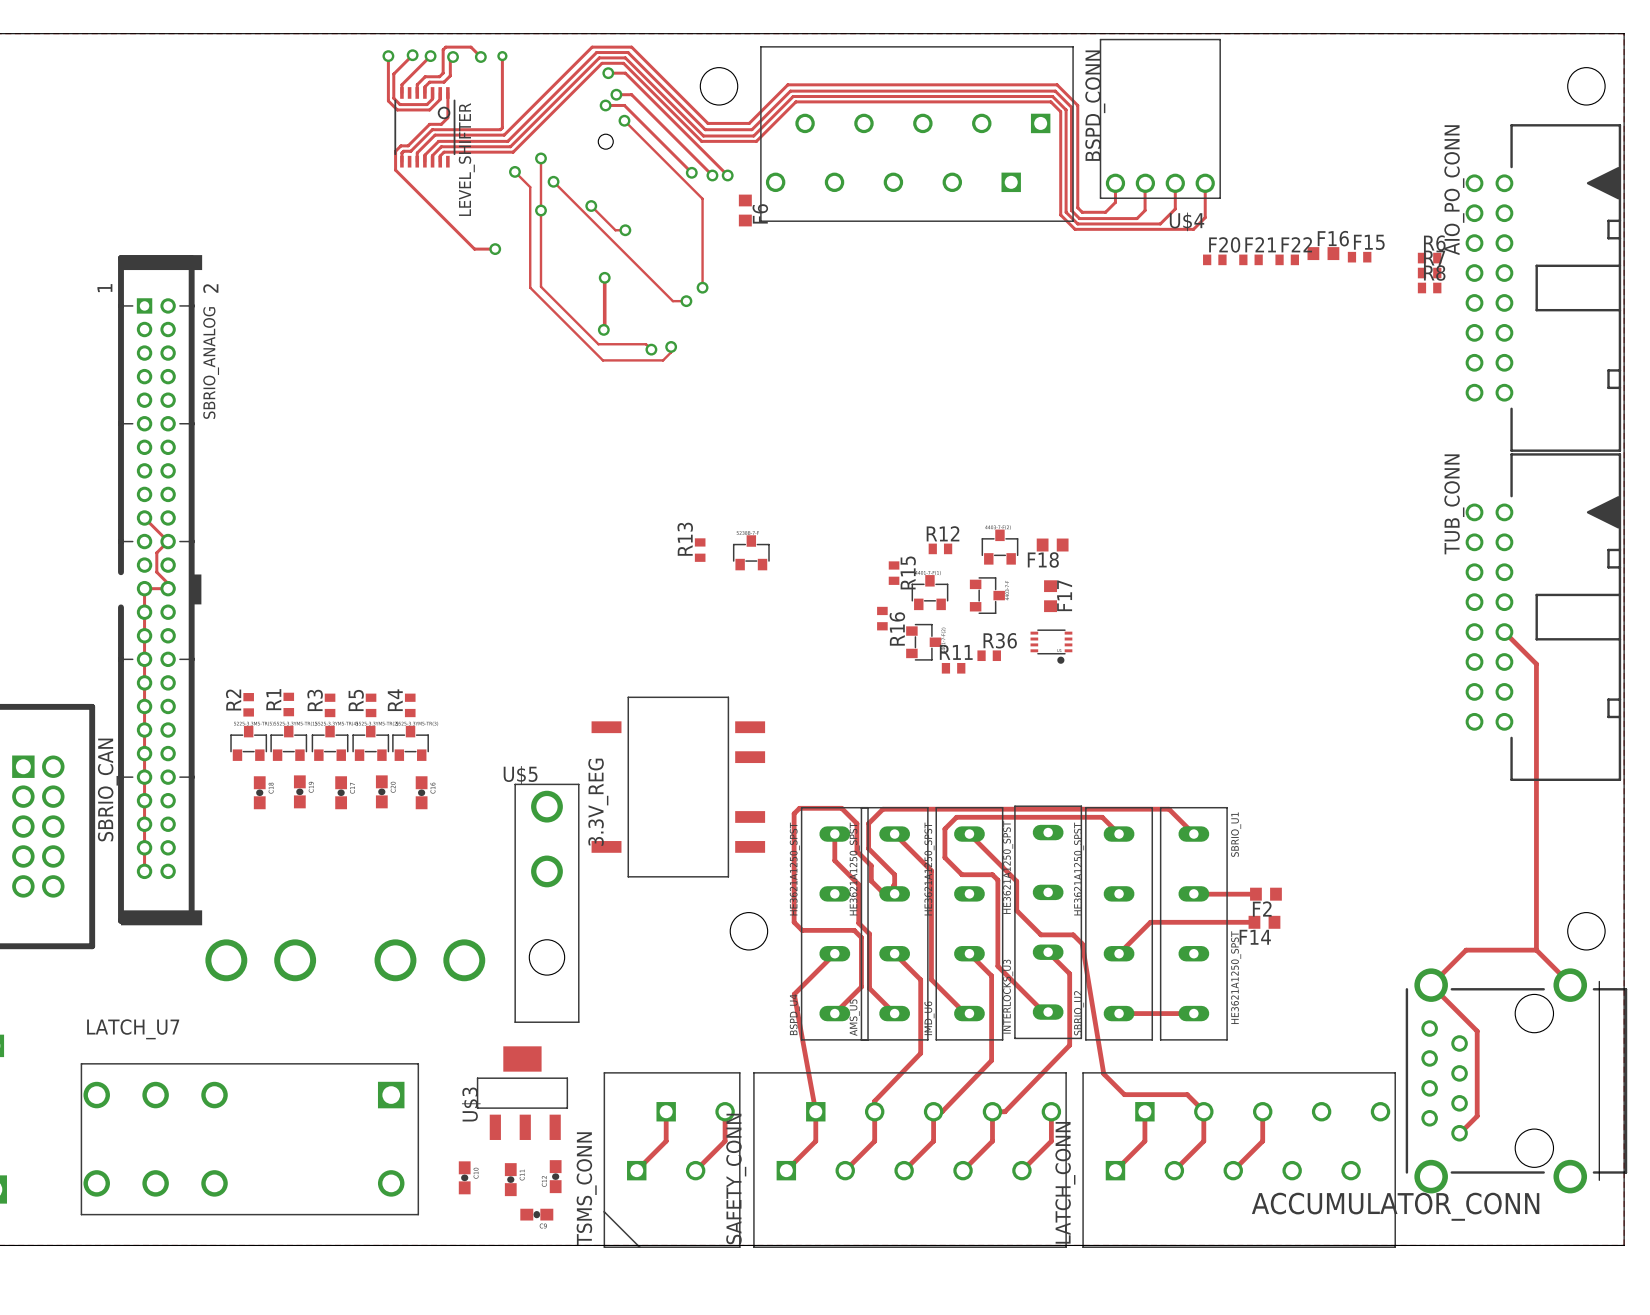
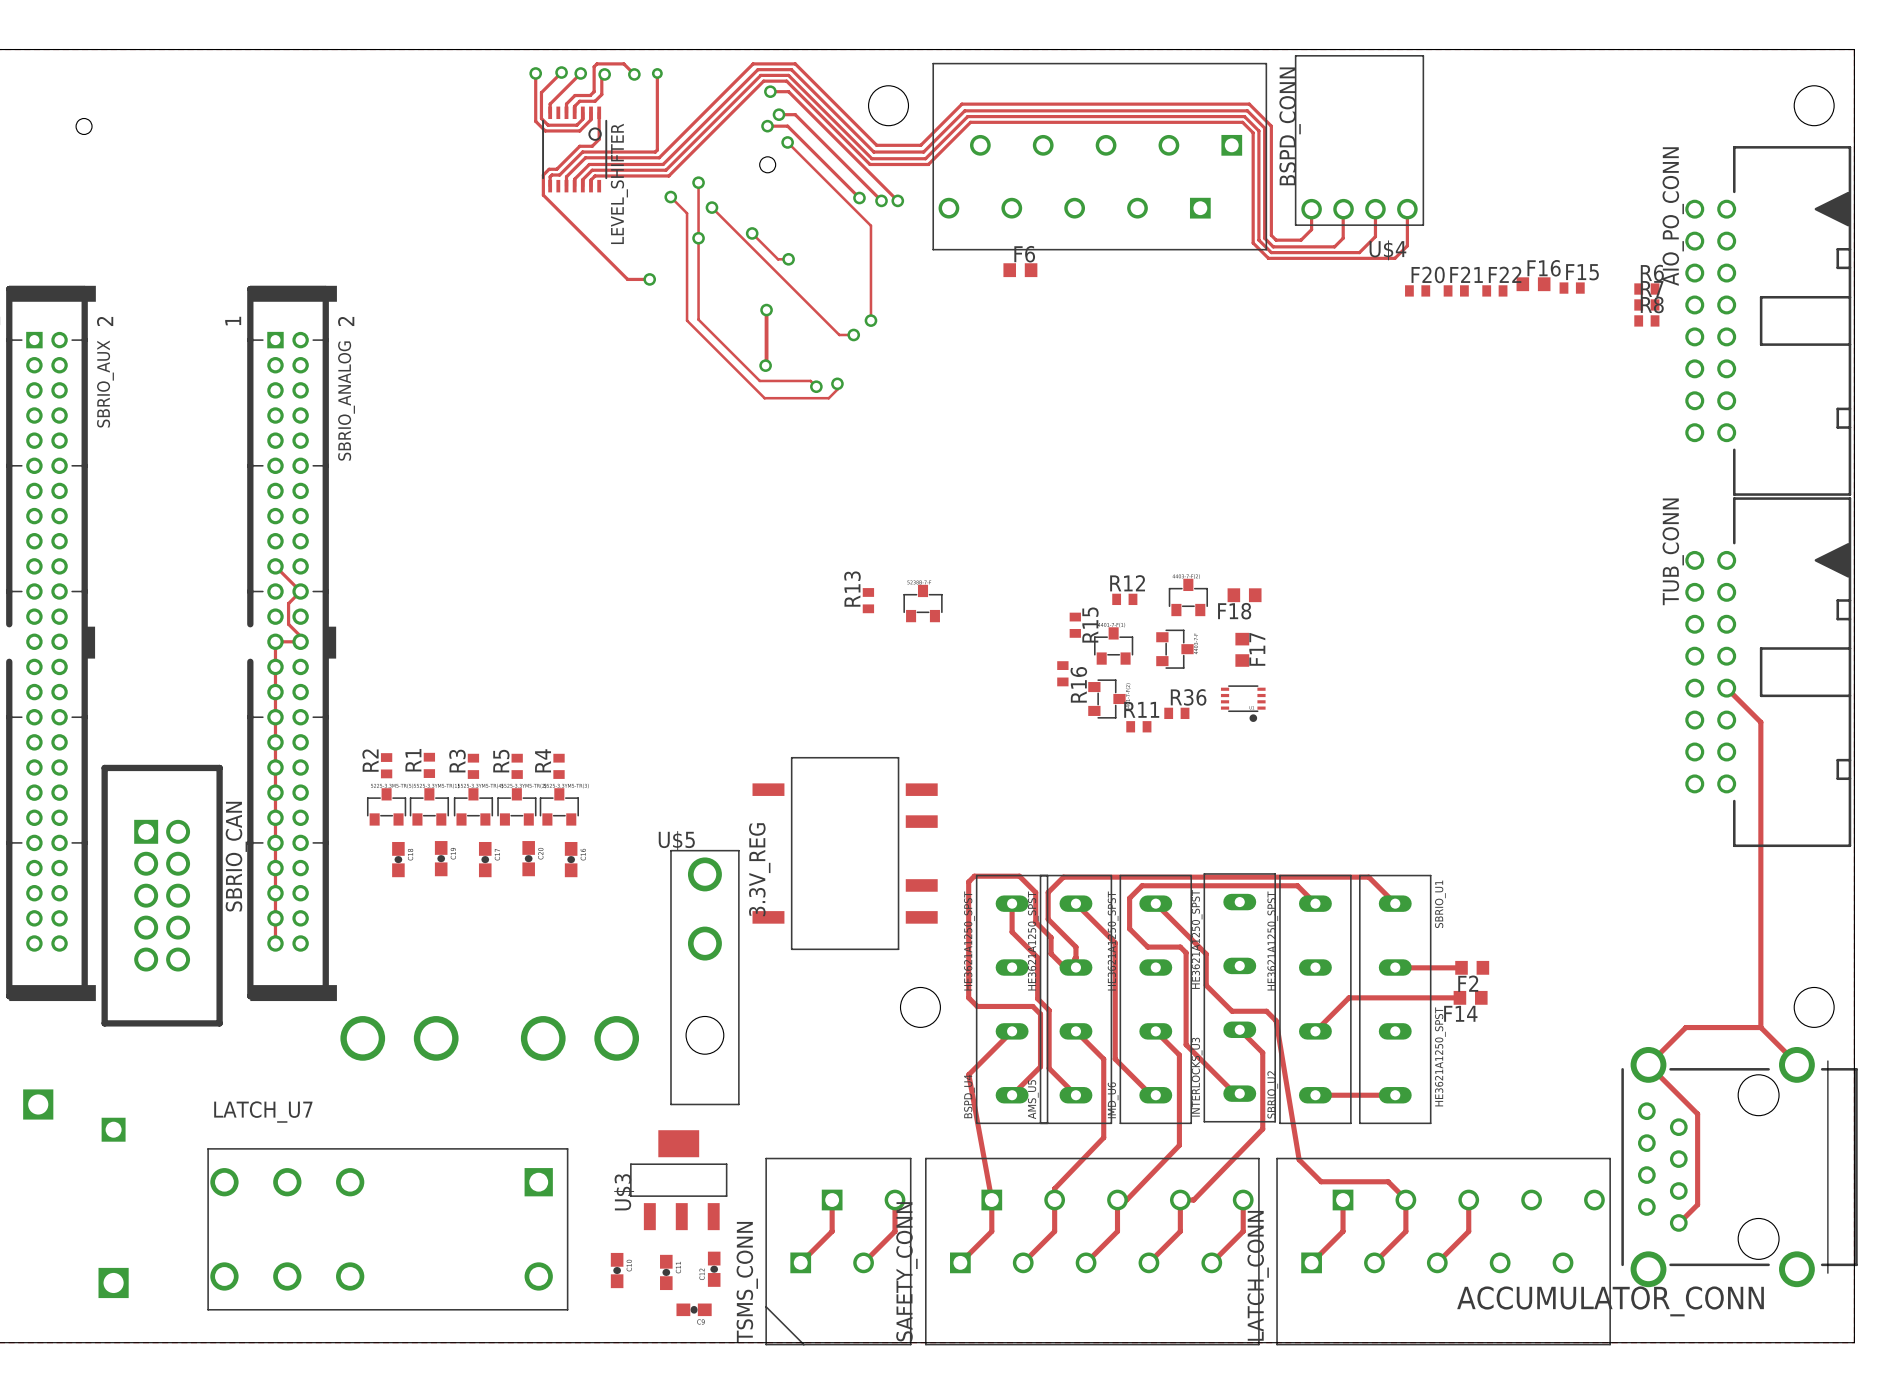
F6 rotation: 0° (745, 210) -> 90° clockwise (1020, 270)
F6 position: (745, 210) -> (1020, 270)

